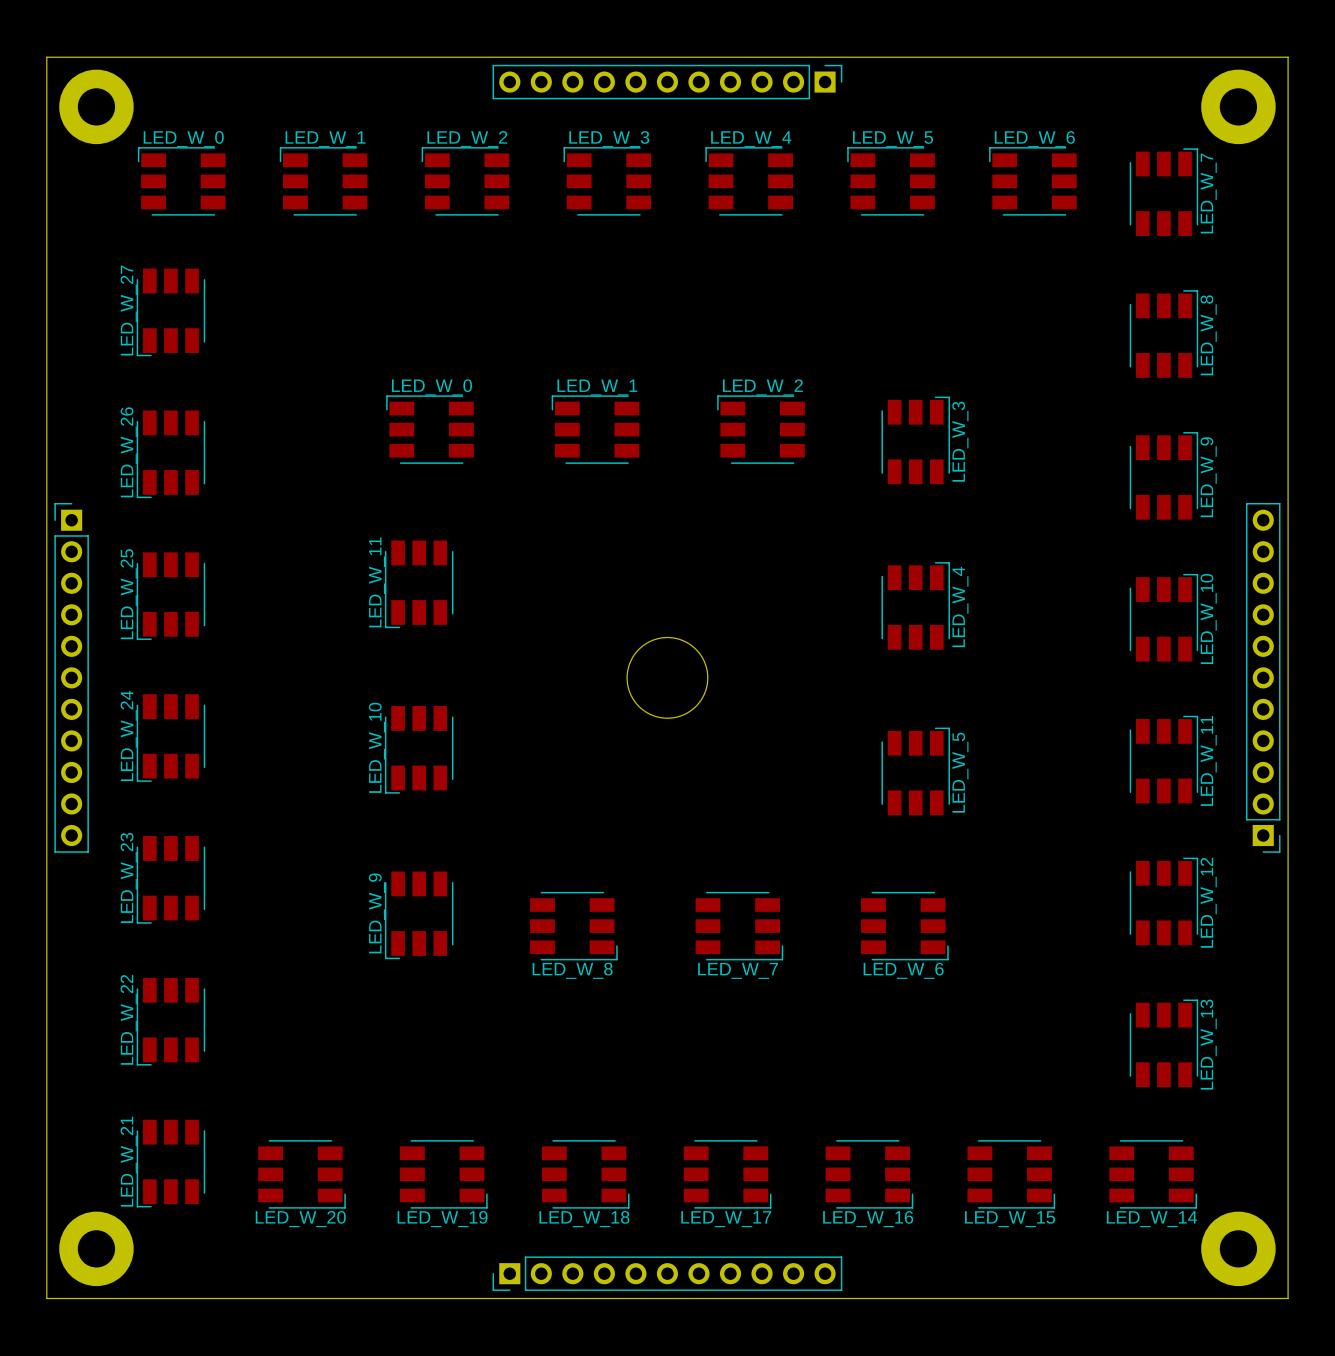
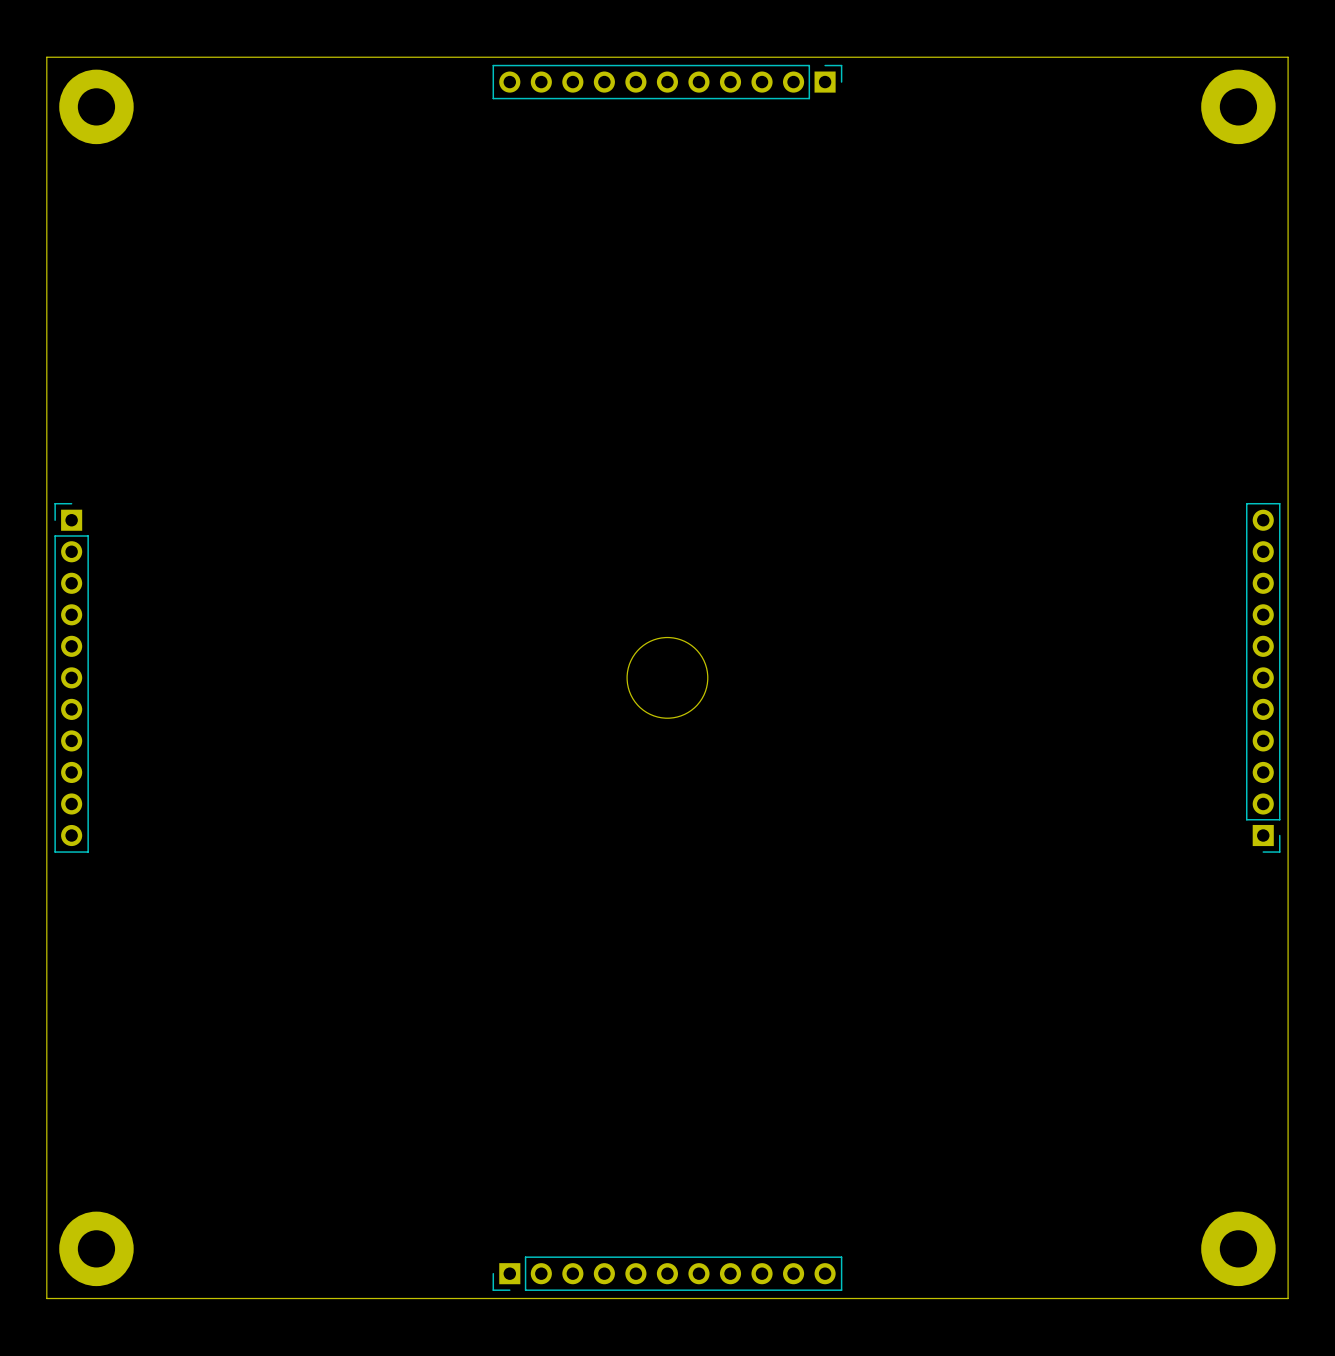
LED_W_0: (181, 181) -> none
LED_W_1: (323, 181) -> none
LED_W_2: (465, 181) -> none
LED_W_3: (607, 181) -> none
LED_W_4: (749, 181) -> none
LED_W_5: (891, 181) -> none
LED_W_6: (1032, 181) -> none
LED_W_7: (1163, 192) -> none
LED_W_27: (170, 312) -> none
LED_W_8: (1163, 334) -> none
LED_W_0: (429, 429) -> none
LED_W_1: (595, 429) -> none
LED_W_2: (760, 429) -> none
LED_W_3: (915, 440) -> none
LED_W_26: (170, 454) -> none
LED_W_9: (1163, 475) -> none
LED_W_11: (419, 584) -> none
LED_W_25: (170, 596) -> none
LED_W_4: (915, 605) -> none
LED_W_10: (1163, 617) -> none
LED_W_24: (170, 738) -> none
LED_W_10: (419, 749) -> none
LED_W_11: (1163, 759) -> none
LED_W_5: (915, 771) -> none
LED_W_23: (170, 879) -> none
LED_W_12: (1163, 901) -> none
LED_W_9: (419, 915) -> none
LED_W_8: (573, 926) -> none
LED_W_7: (739, 926) -> none
LED_W_6: (904, 926) -> none
LED_W_22: (170, 1021) -> none
LED_W_13: (1163, 1043) -> none
LED_W_21: (170, 1163) -> none
LED_W_20: (301, 1174) -> none
LED_W_19: (443, 1174) -> none
LED_W_18: (585, 1174) -> none
LED_W_17: (727, 1174) -> none
LED_W_16: (869, 1174) -> none
LED_W_15: (1011, 1174) -> none
LED_W_14: (1153, 1174) -> none

